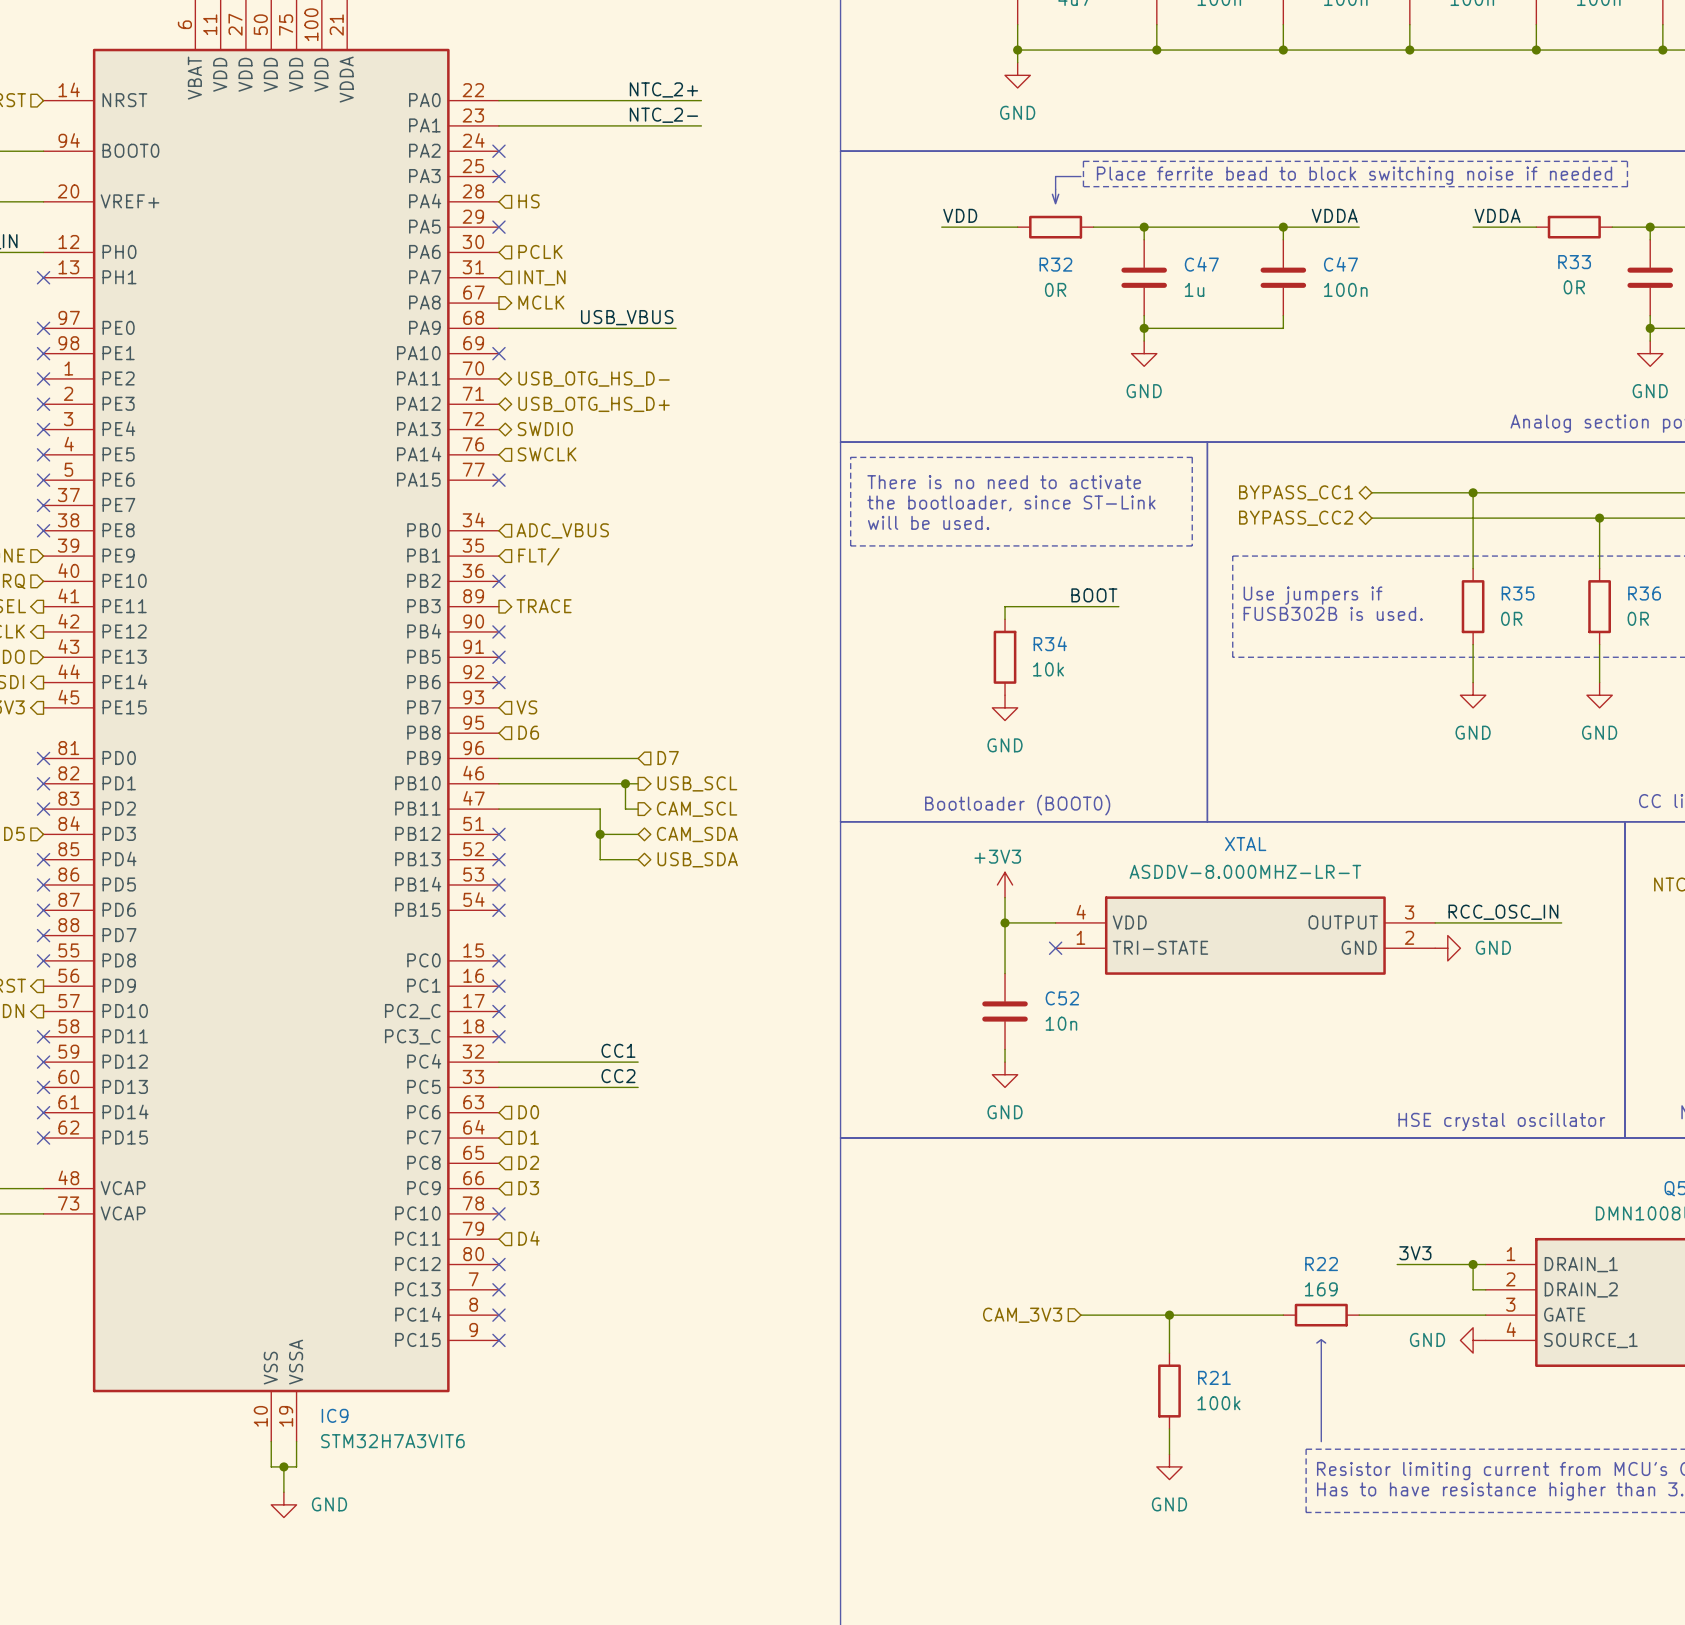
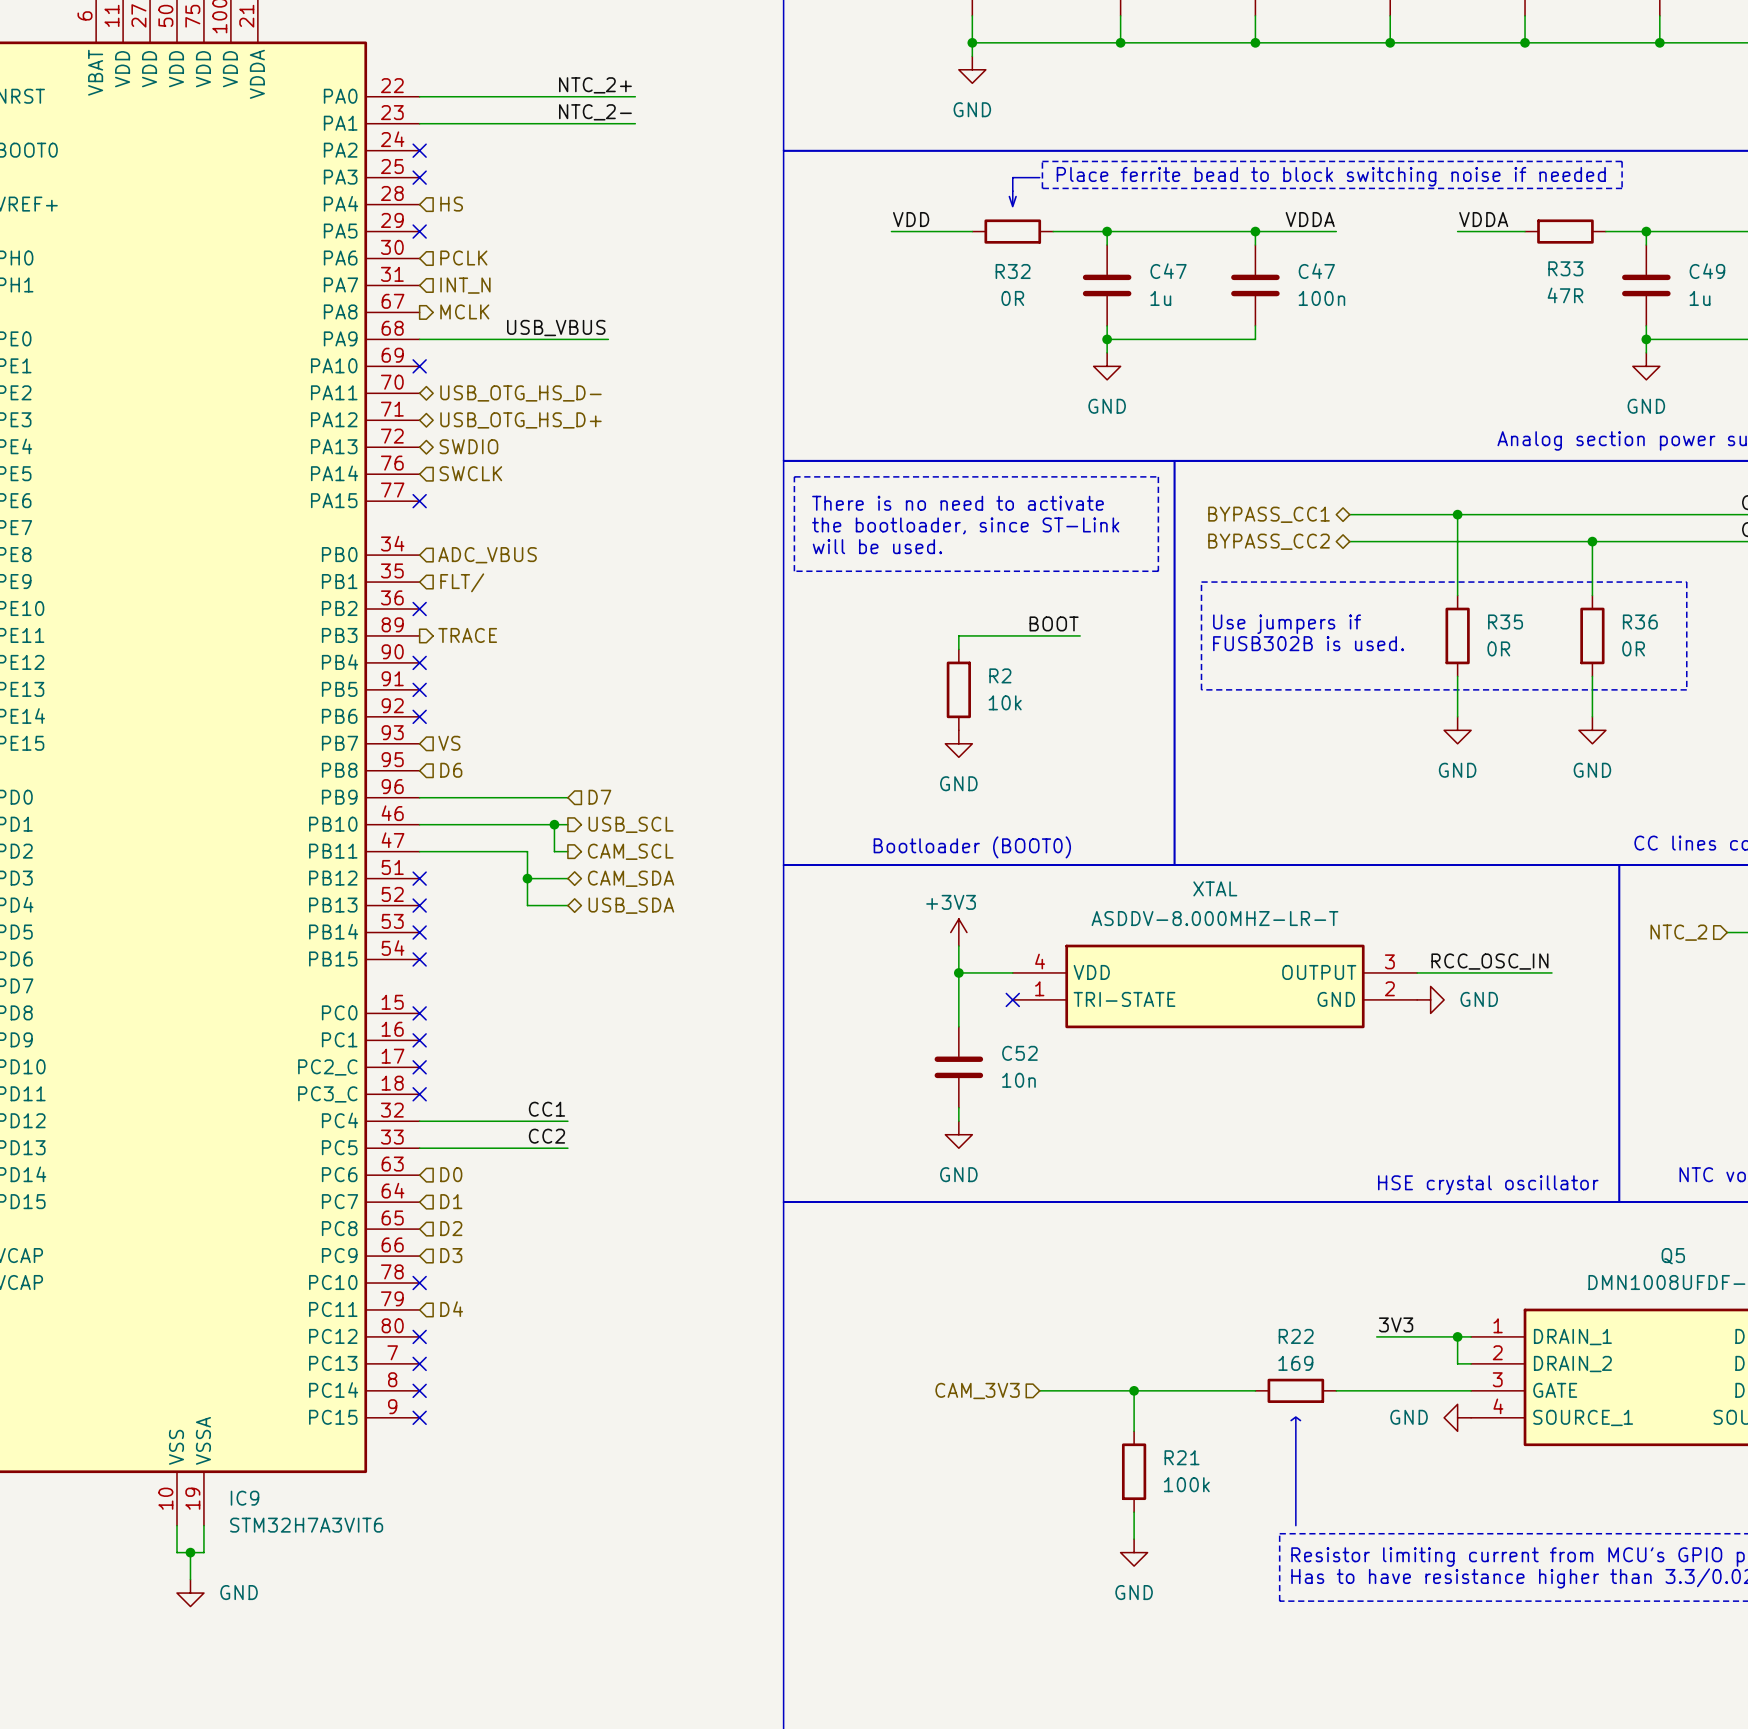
R33 value: 0R (1574, 287) -> 47R (1565, 295)
R34 name: R34 (1050, 643) -> R2 (1000, 675)

